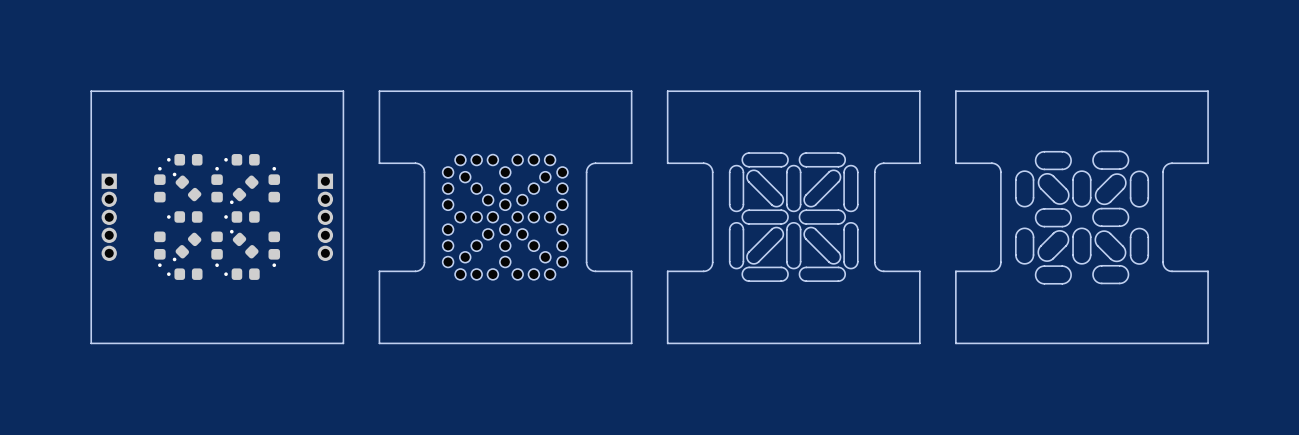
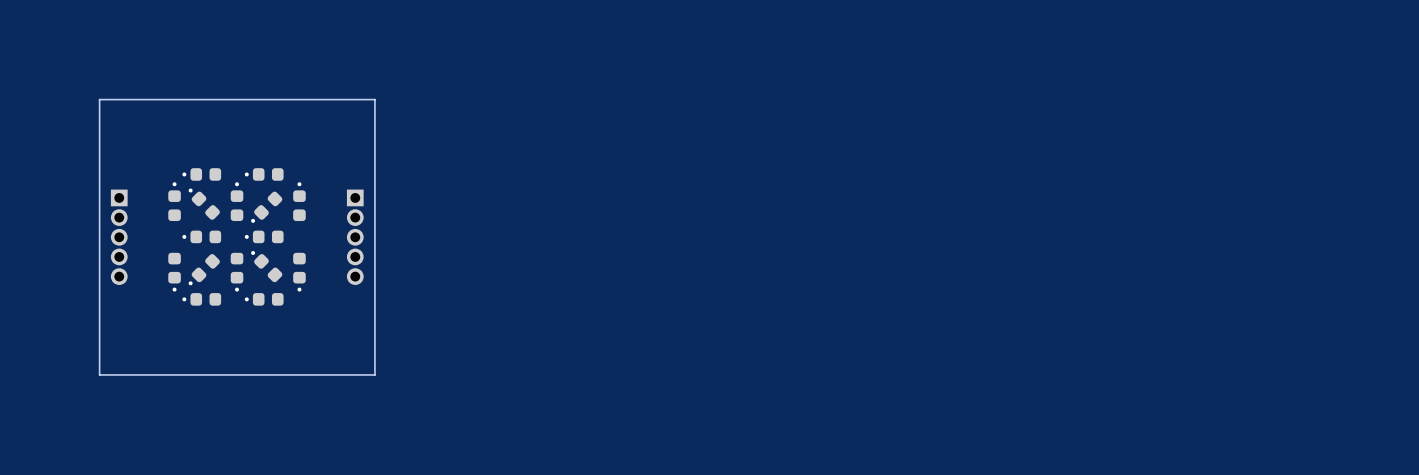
board edge: (379, 91) (631, 91) (631, 163) (593, 163) (588, 166) (586, 172) (586, 264) (594, 271) (631, 271) (631, 343) (379, 343) (379, 271) (417, 271) (422, 267) (424, 262) (424, 169) (416, 163) (379, 163) (379, 91) -> none
board edge: (667, 91) (919, 91) (919, 163) (881, 163) (876, 166) (874, 172) (875, 264) (882, 271) (919, 271) (919, 343) (667, 343) (667, 271) (706, 271) (710, 267) (712, 262) (712, 169) (704, 163) (667, 163) (667, 91) -> none
board edge: (955, 91) (955, 163) (994, 163) (999, 166) (1000, 172) (1000, 264) (993, 271) (955, 271) (955, 343) (1208, 343) (1208, 271) (1169, 271) (1164, 267) (1163, 262) (1163, 169) (1170, 163) (1208, 163) (1208, 91) (955, 91) -> none
board edge: (1044, 151) (1066, 152) (1070, 158) (1069, 164) (1063, 169) (1040, 168) (1036, 163) (1035, 158) (1039, 153) (1044, 151) -> none
board edge: (1101, 151) (1124, 152) (1128, 157) (1127, 164) (1120, 168) (1097, 167) (1093, 163) (1093, 157) (1096, 153) (1101, 151) -> none
board edge: (749, 153) (782, 153) (787, 156) (787, 161) (782, 166) (747, 166) (743, 163) (742, 159) (744, 154) (749, 153) -> none
board edge: (806, 153) (840, 153) (844, 156) (844, 161) (839, 166) (804, 166) (800, 163) (799, 159) (802, 154) (806, 153) -> none
part: (476, 160) -> none
part: (533, 160) -> none
board edge: (729, 172) (729, 206) (733, 210) (738, 211) (743, 205) (743, 170) (739, 166) (735, 165) (731, 168) (729, 172) -> none
board edge: (758, 172) (782, 196) (783, 201) (779, 205) (772, 205) (747, 180) (747, 175) (749, 171) (754, 170) (758, 172) -> none
board edge: (786, 172) (787, 206) (790, 210) (795, 211) (800, 205) (800, 170) (797, 166) (792, 165) (788, 168) (786, 172) -> none
board edge: (828, 172) (805, 196) (804, 201) (807, 205) (815, 205) (839, 180) (840, 175) (837, 171) (832, 170) (828, 172) -> none
board edge: (844, 172) (844, 206) (847, 210) (852, 211) (857, 205) (857, 170) (854, 166) (850, 165) (845, 168) (844, 172) -> none
board edge: (1053, 176) (1068, 192) (1067, 199) (1062, 203) (1054, 202) (1038, 184) (1039, 179) (1042, 174) (1048, 173) (1053, 176) -> none
board edge: (1015, 179) (1017, 202) (1022, 206) (1029, 205) (1033, 198) (1032, 175) (1028, 171) (1022, 171) (1017, 174) (1015, 179) -> none
board edge: (1073, 179) (1074, 202) (1079, 206) (1086, 205) (1090, 198) (1089, 175) (1085, 171) (1079, 171) (1074, 174) (1073, 179) -> none
board edge: (1130, 180) (1131, 202) (1137, 206) (1143, 205) (1148, 199) (1147, 175) (1142, 172) (1137, 171) (1132, 174) (1130, 180) -> none
part: (448, 188) -> none
part: (476, 188) -> none
part: (505, 188) -> none
part: (533, 188) -> none
part: (562, 188) -> none
board edge: (1110, 201) (1125, 185) (1124, 178) (1119, 174) (1111, 175) (1095, 193) (1096, 198) (1099, 203) (1105, 204) (1110, 201) -> none
board edge: (1044, 208) (1066, 210) (1070, 215) (1069, 222) (1063, 226) (1040, 225) (1036, 221) (1035, 215) (1039, 210) (1044, 208) -> none
board edge: (1101, 208) (1124, 209) (1128, 215) (1127, 221) (1120, 226) (1097, 225) (1093, 220) (1093, 215) (1096, 210) (1101, 208) -> none
board edge: (749, 210) (782, 210) (787, 213) (787, 218) (782, 223) (747, 223) (743, 220) (742, 216) (744, 211) (749, 210) -> none
board edge: (806, 210) (840, 210) (844, 213) (844, 218) (839, 223) (804, 223) (800, 220) (799, 216) (802, 211) (806, 210) -> none
part: (476, 217) -> none
part: (533, 217) -> none
board edge: (729, 229) (729, 263) (733, 267) (738, 268) (743, 262) (743, 227) (739, 223) (735, 222) (731, 225) (729, 229) -> none
board edge: (771, 229) (747, 253) (747, 258) (750, 262) (758, 262) (782, 237) (783, 233) (780, 228) (775, 227) (771, 229) -> none
board edge: (786, 229) (787, 263) (790, 267) (795, 268) (800, 262) (800, 227) (797, 223) (792, 222) (788, 225) (786, 229) -> none
board edge: (815, 229) (839, 253) (840, 258) (837, 262) (829, 262) (805, 237) (804, 232) (806, 228) (811, 227) (815, 229) -> none
board edge: (844, 229) (844, 263) (847, 267) (852, 268) (857, 262) (857, 227) (854, 223) (850, 222) (845, 225) (844, 229) -> none
board edge: (1053, 233) (1058, 230) (1064, 232) (1067, 236) (1068, 241) (1052, 259) (1044, 260) (1039, 256) (1038, 250) (1053, 233) -> none
board edge: (1110, 233) (1125, 250) (1124, 256) (1119, 261) (1111, 259) (1095, 242) (1095, 236) (1099, 232) (1105, 231) (1110, 233) -> none
board edge: (1015, 237) (1017, 259) (1022, 263) (1029, 262) (1033, 256) (1032, 232) (1028, 229) (1022, 228) (1017, 231) (1015, 237) -> none
board edge: (1073, 237) (1074, 259) (1079, 263) (1086, 262) (1090, 256) (1089, 232) (1085, 229) (1079, 228) (1074, 231) (1073, 237) -> none
board edge: (1130, 237) (1131, 259) (1137, 263) (1143, 262) (1148, 256) (1147, 232) (1142, 229) (1137, 228) (1132, 231) (1130, 237) -> none
part: (448, 245) -> none
part: (476, 245) -> none
part: (505, 245) -> none
part: (533, 245) -> none
part: (562, 245) -> none
board edge: (1101, 265) (1124, 266) (1128, 272) (1127, 279) (1120, 283) (1097, 282) (1093, 277) (1093, 272) (1096, 267) (1101, 265) -> none
board edge: (1044, 266) (1066, 267) (1070, 272) (1069, 279) (1063, 283) (1040, 282) (1036, 278) (1035, 272) (1039, 267) (1044, 266) -> none
board edge: (749, 267) (782, 267) (787, 270) (787, 276) (782, 281) (747, 280) (743, 277) (742, 273) (744, 268) (749, 267) -> none
board edge: (806, 267) (840, 267) (844, 270) (844, 276) (839, 281) (804, 280) (800, 277) (799, 273) (802, 268) (806, 267) -> none
part: (476, 274) -> none
part: (533, 274) -> none

